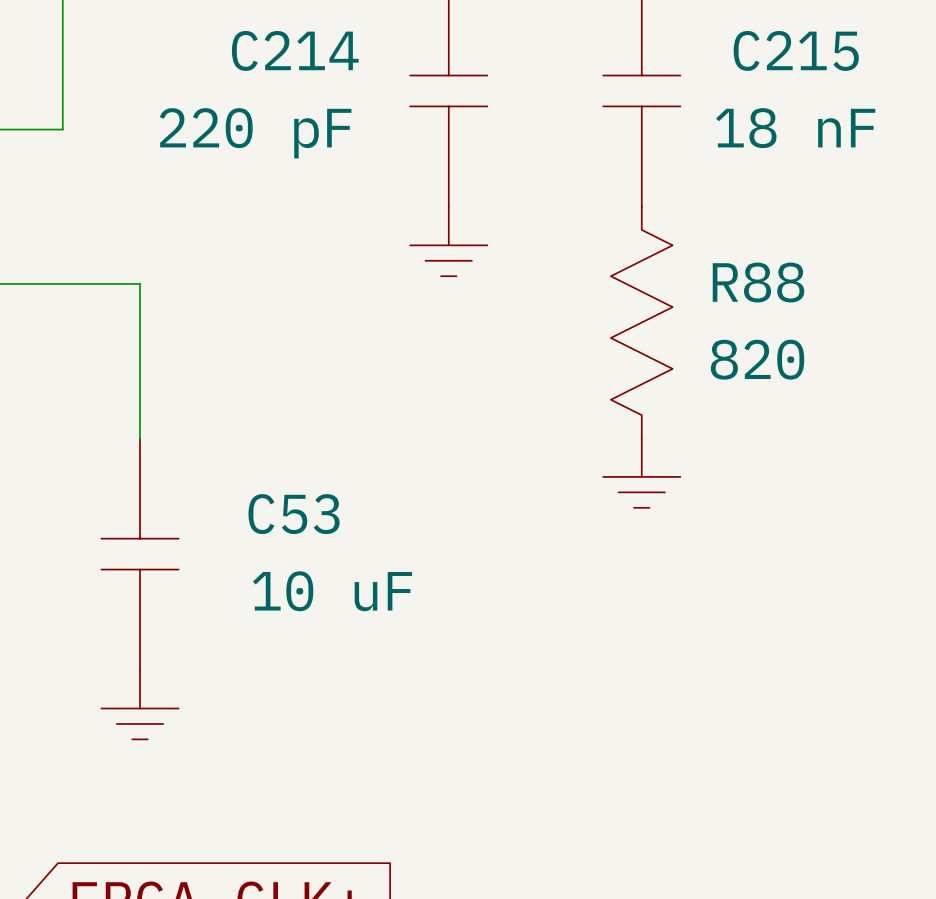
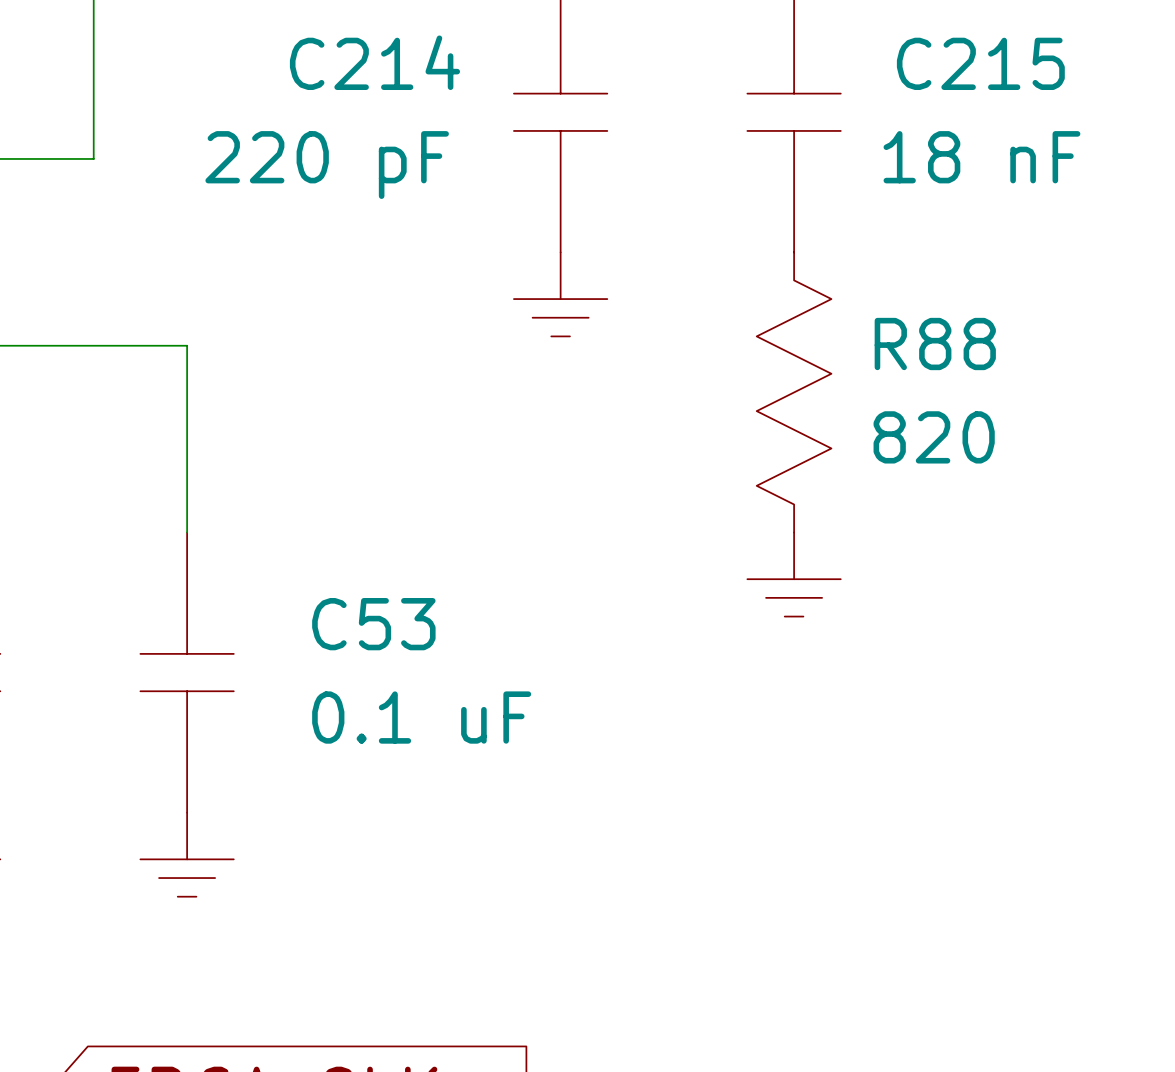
C53 value: 10 uF (332, 591) -> 0.1 uF (421, 717)

